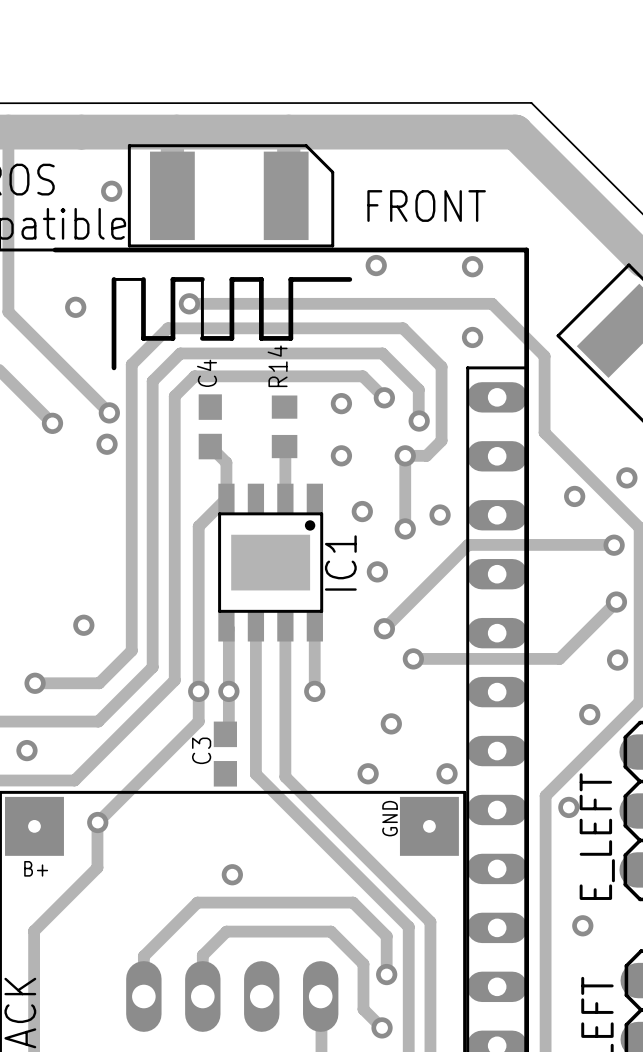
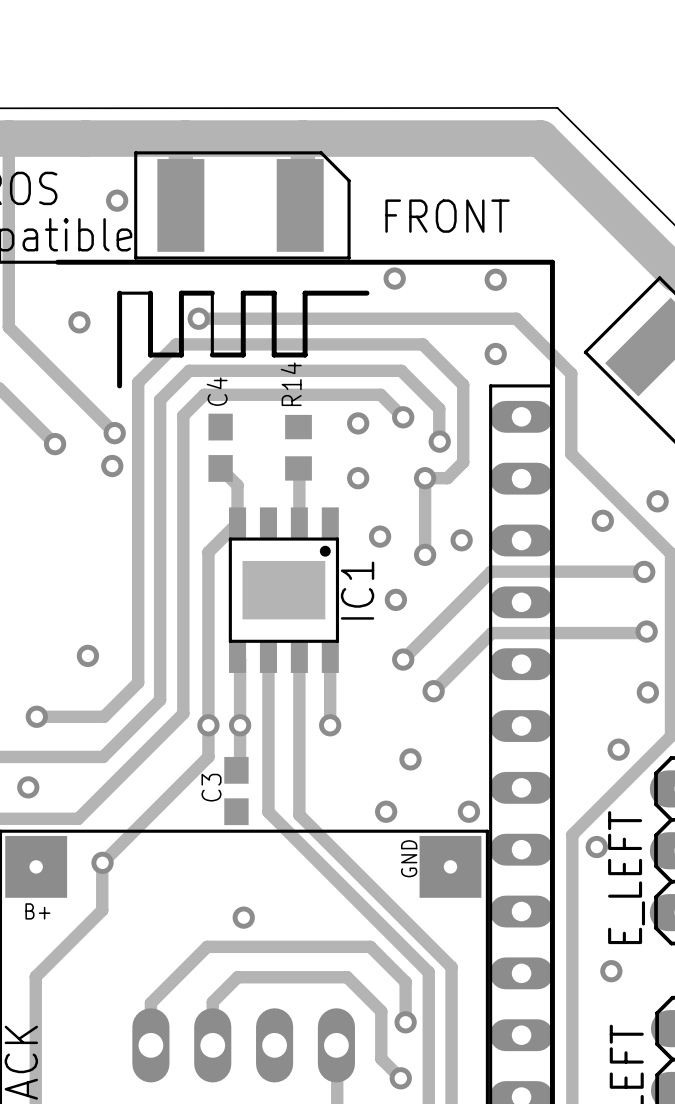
track: (615, 603) (559, 658) (413, 658) -> (645, 633) (491, 633) (433, 691)

